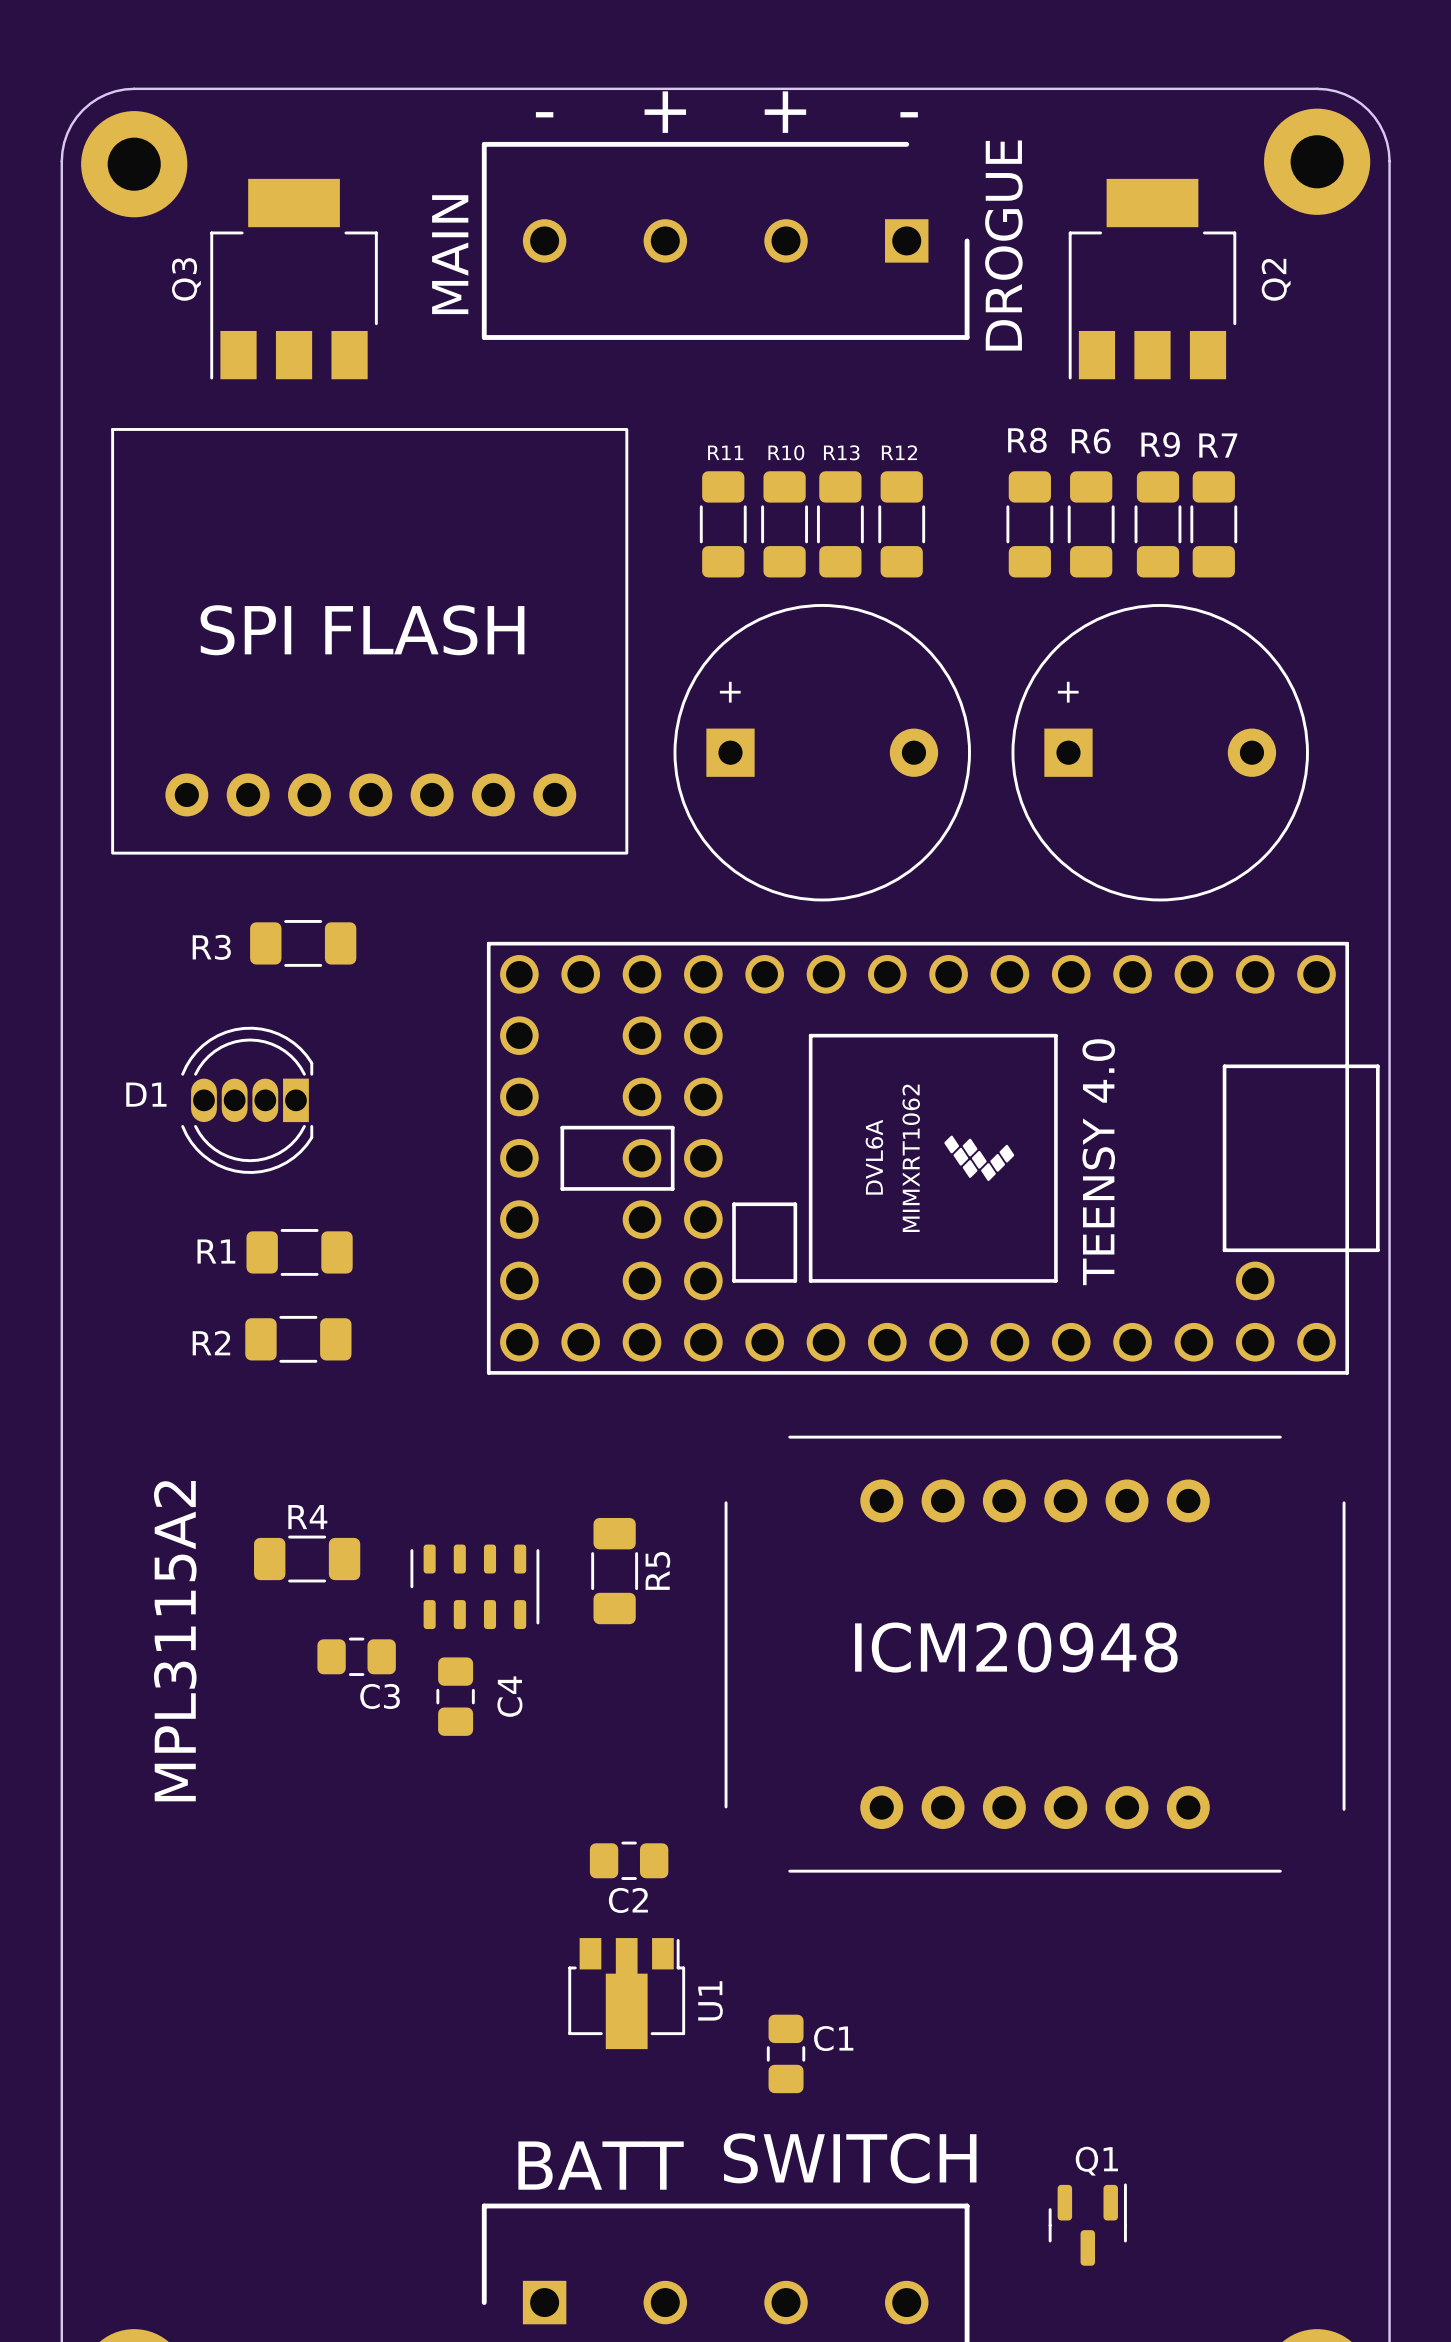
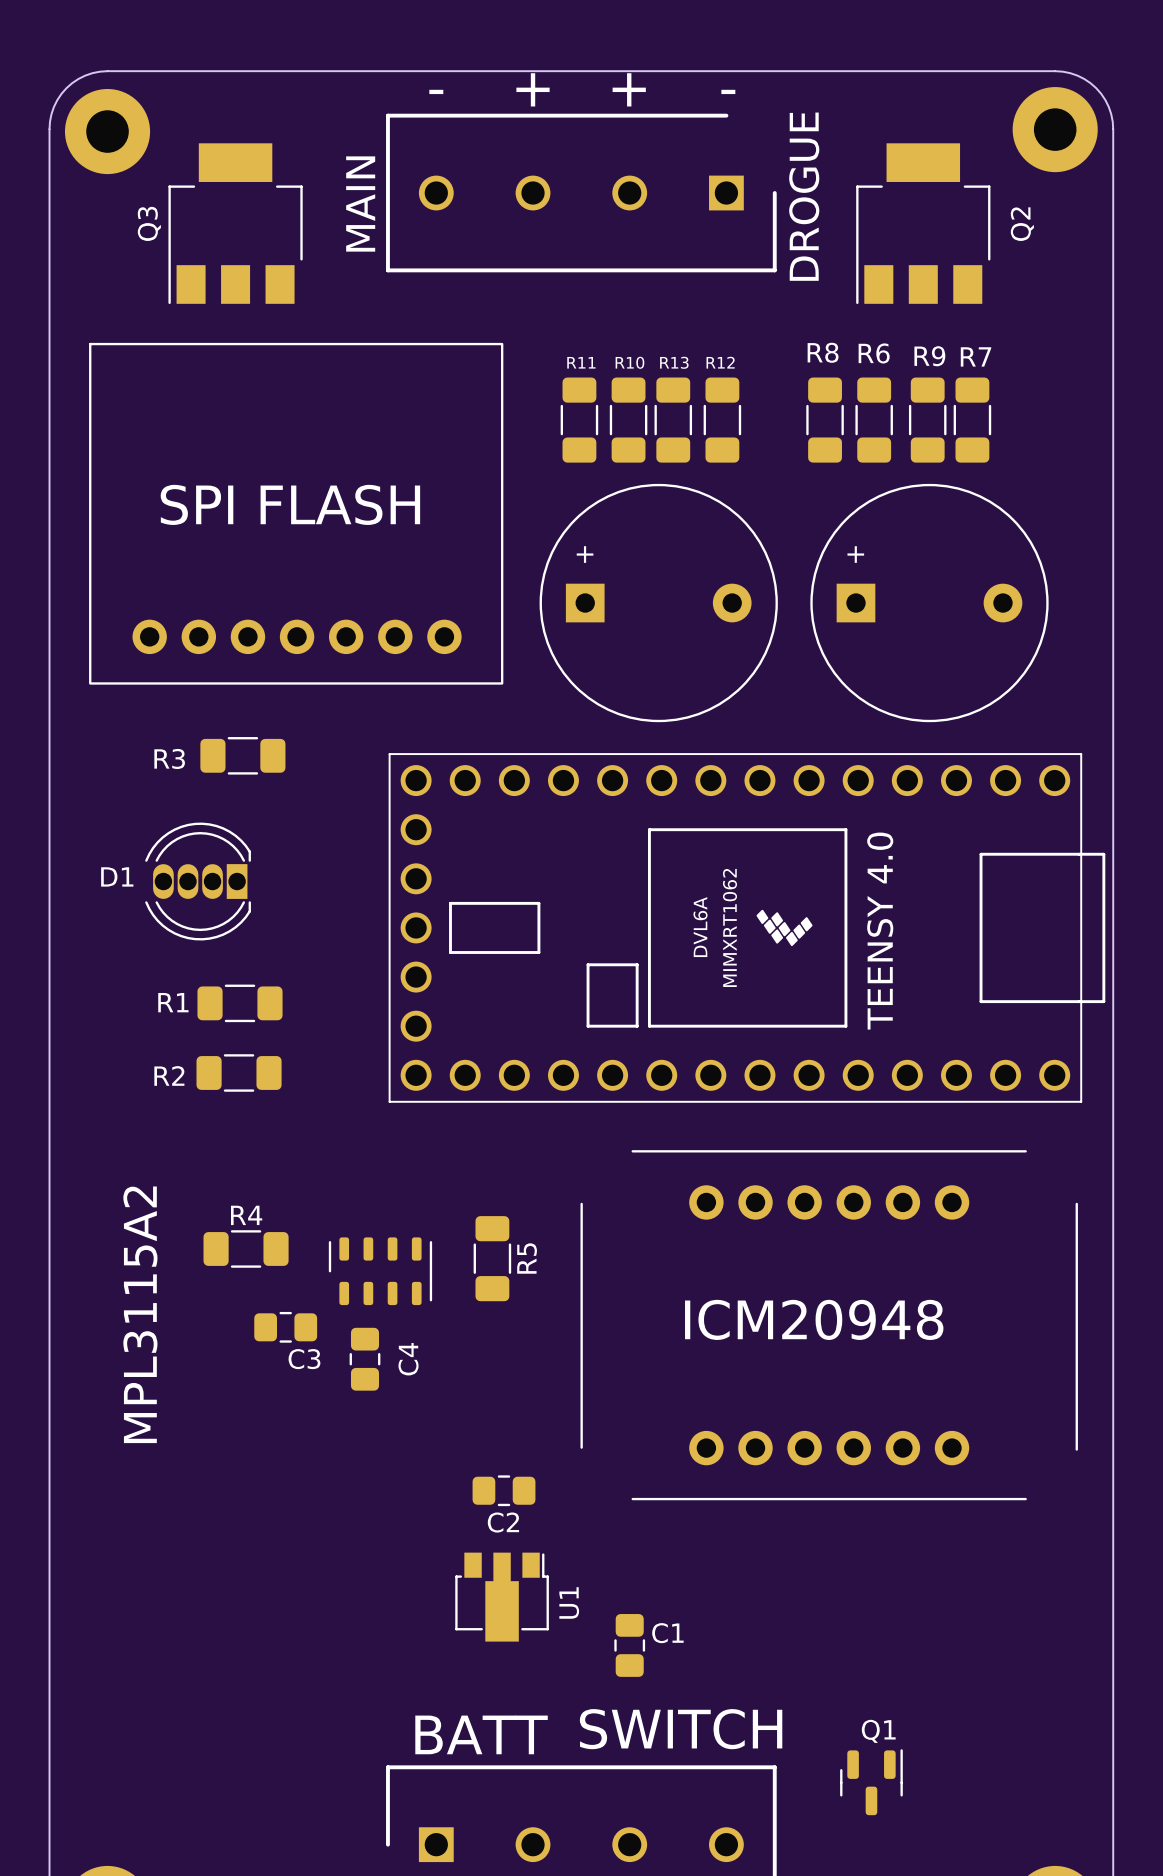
part footprint: [486, 941, 1380, 1375] -> [388, 753, 1106, 1103]

